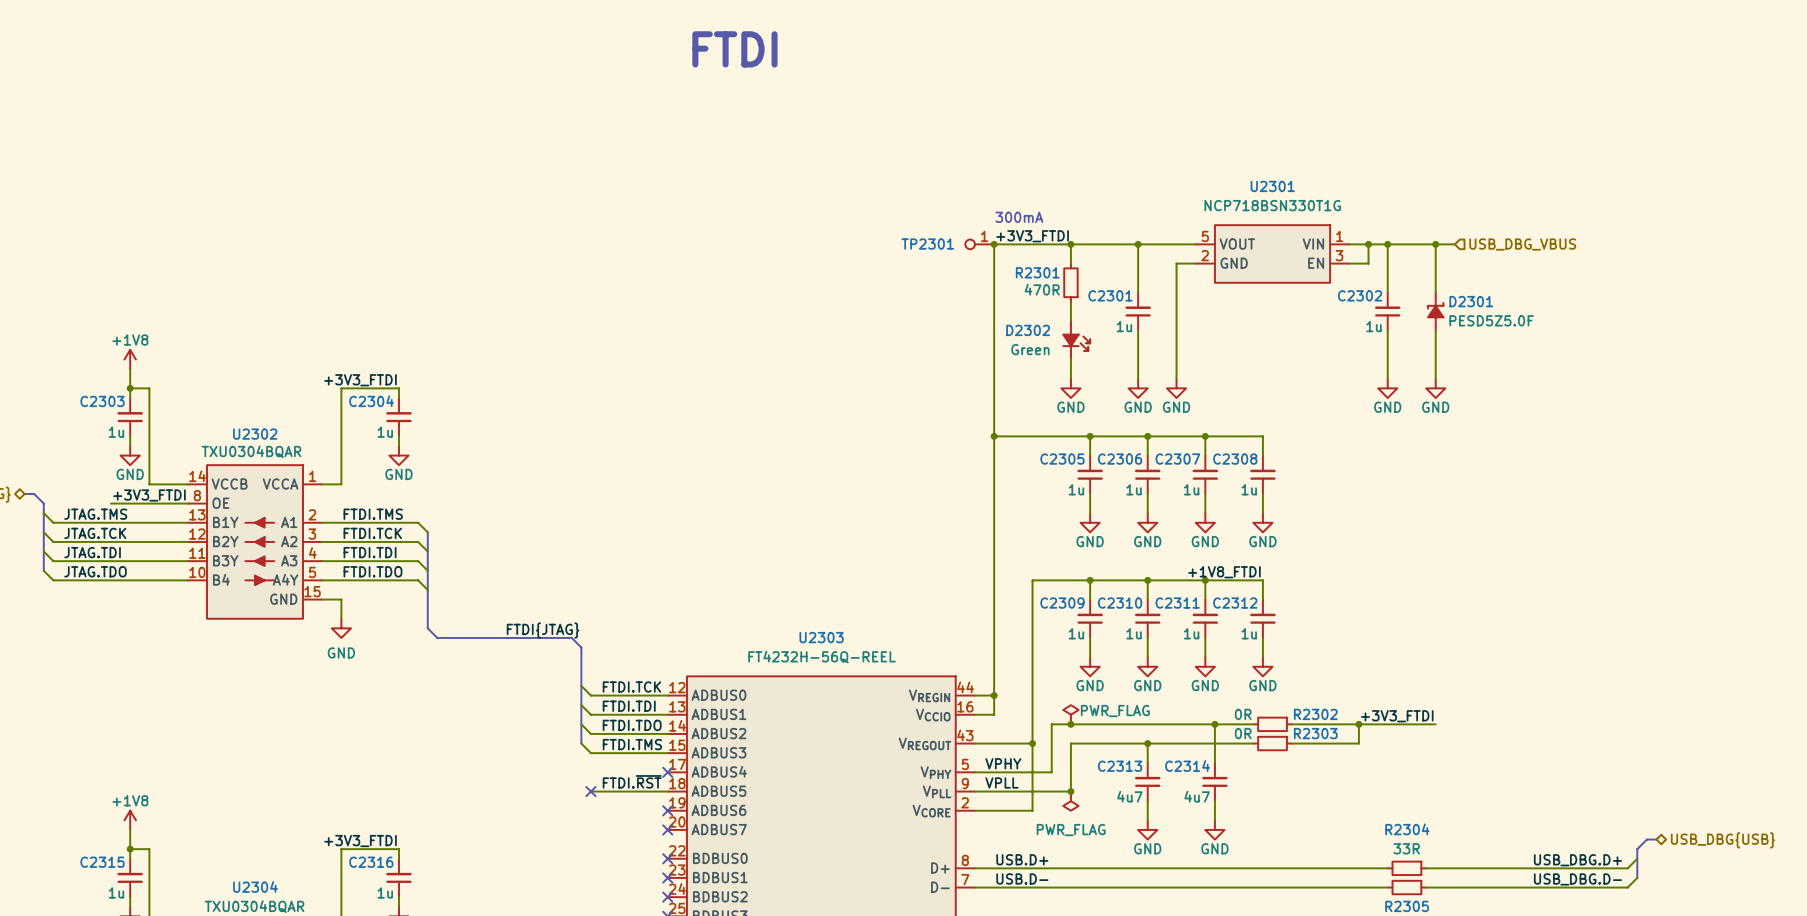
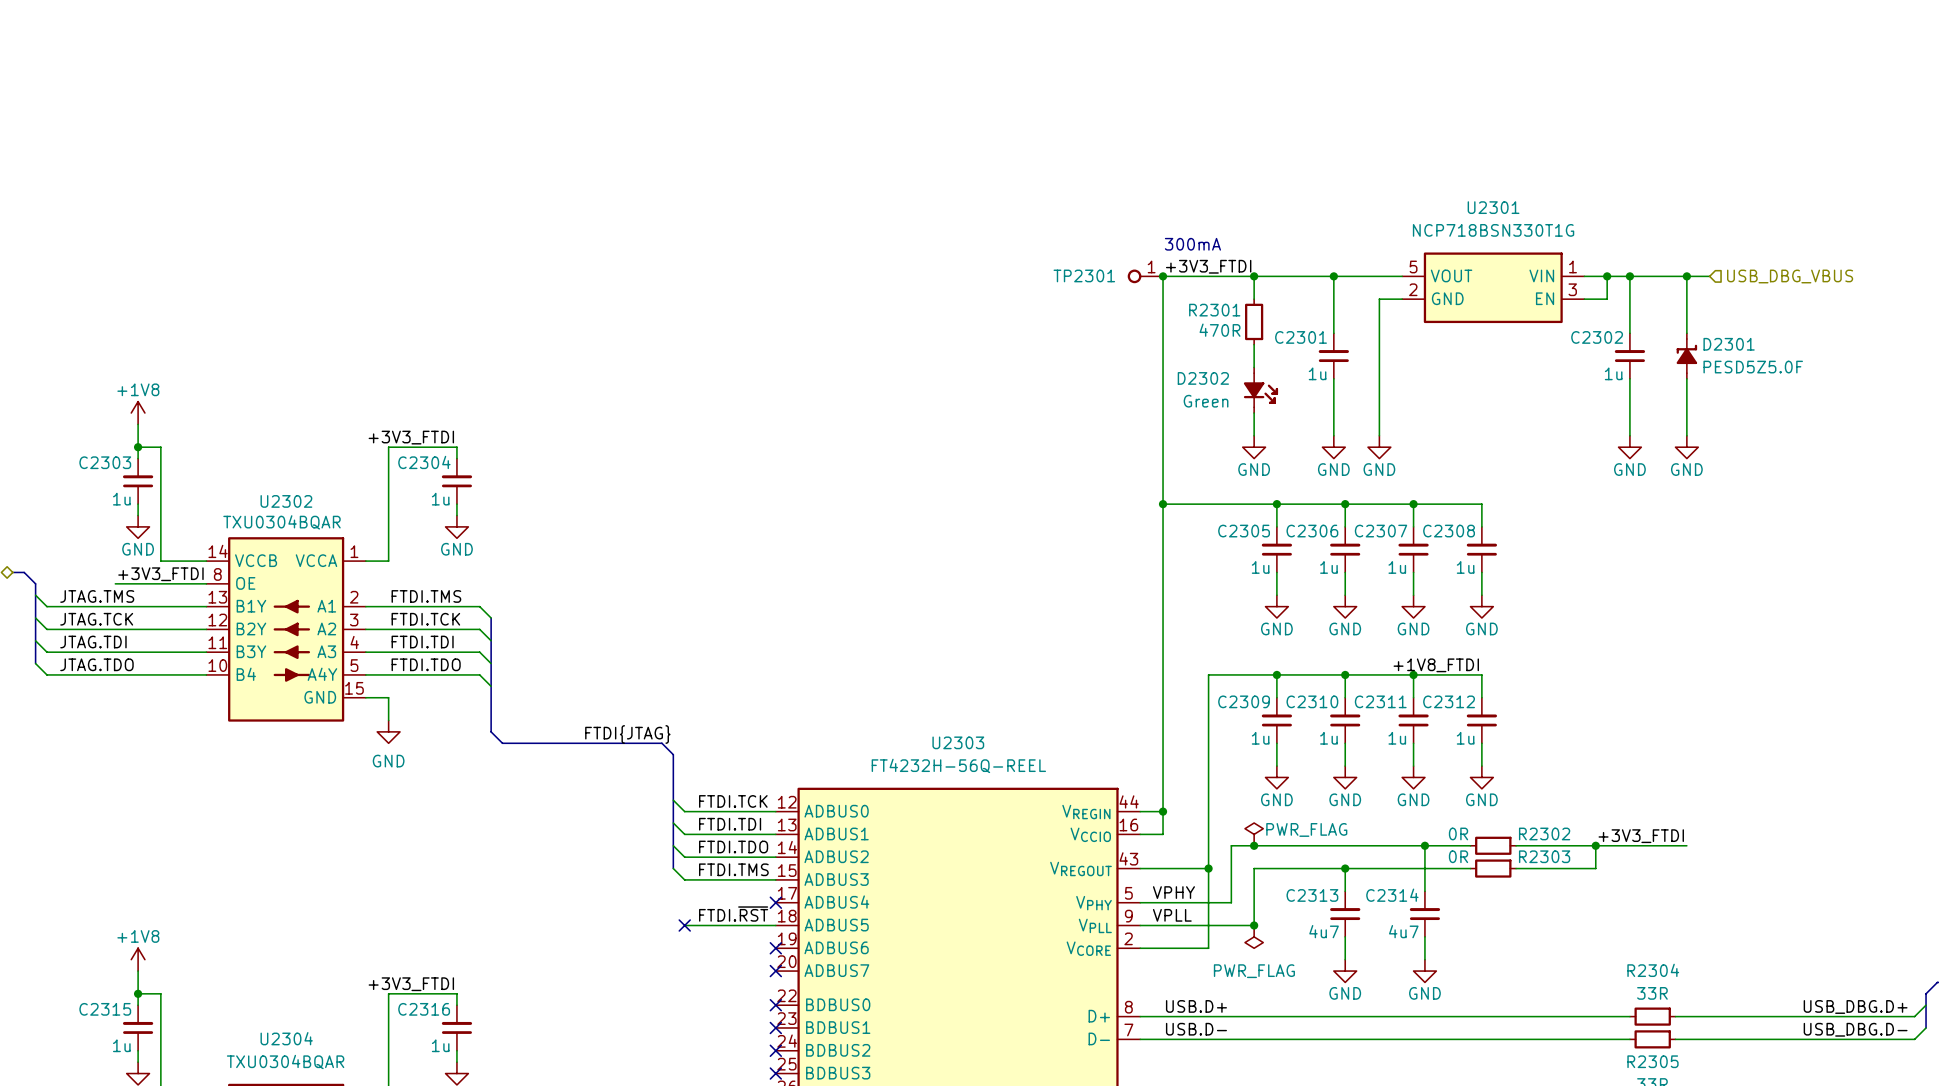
text: FTDI (734, 49) -> none

